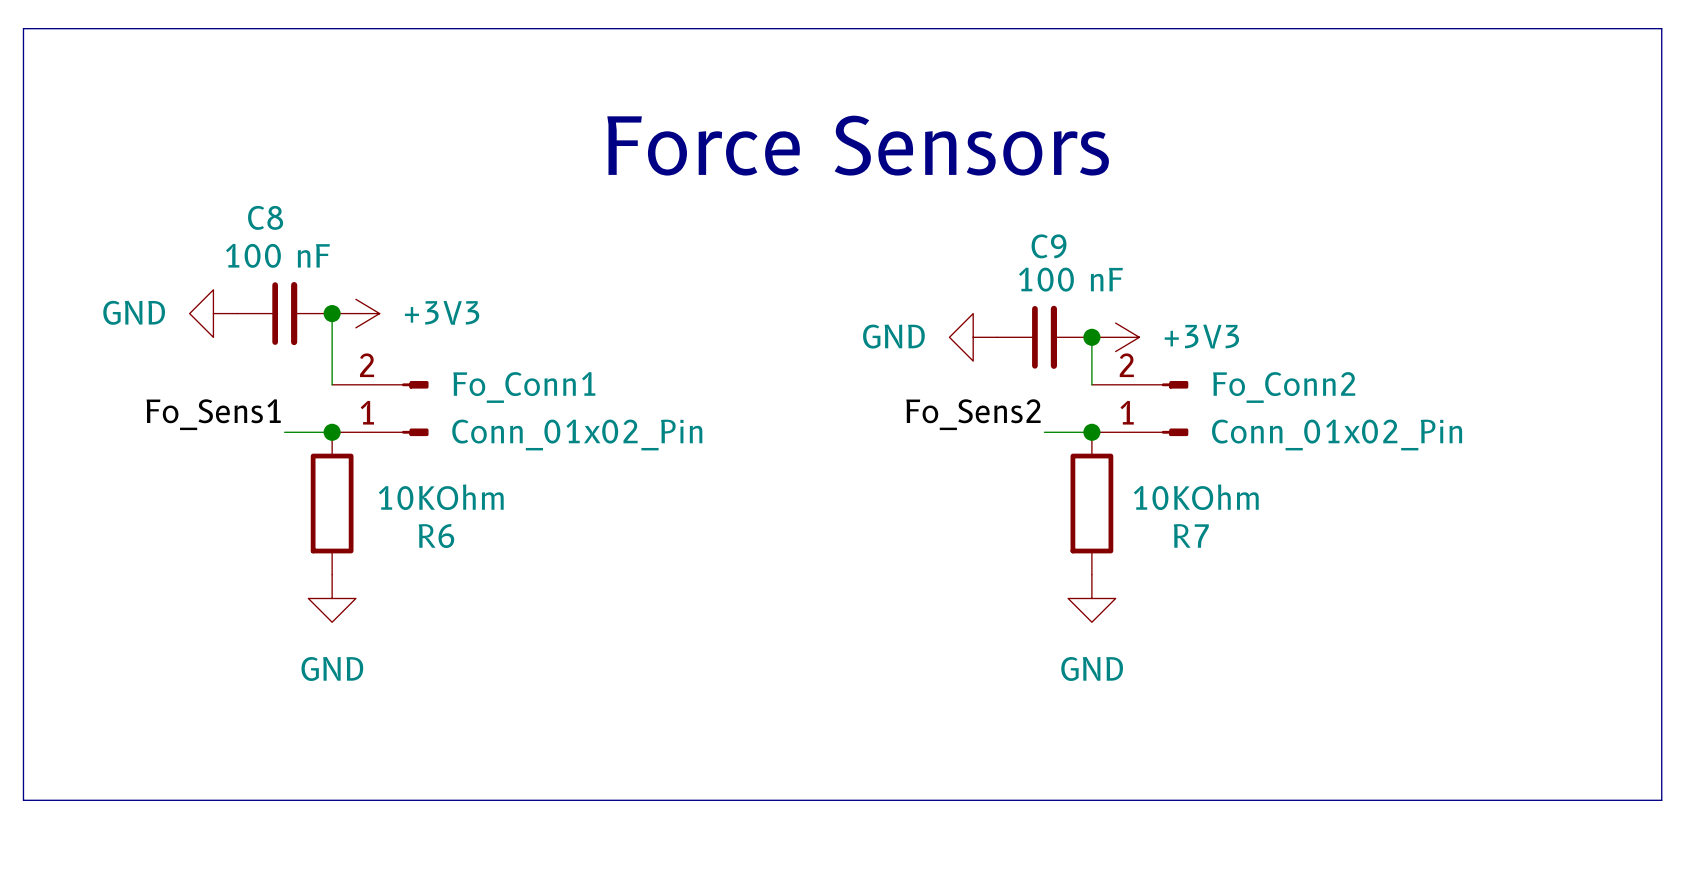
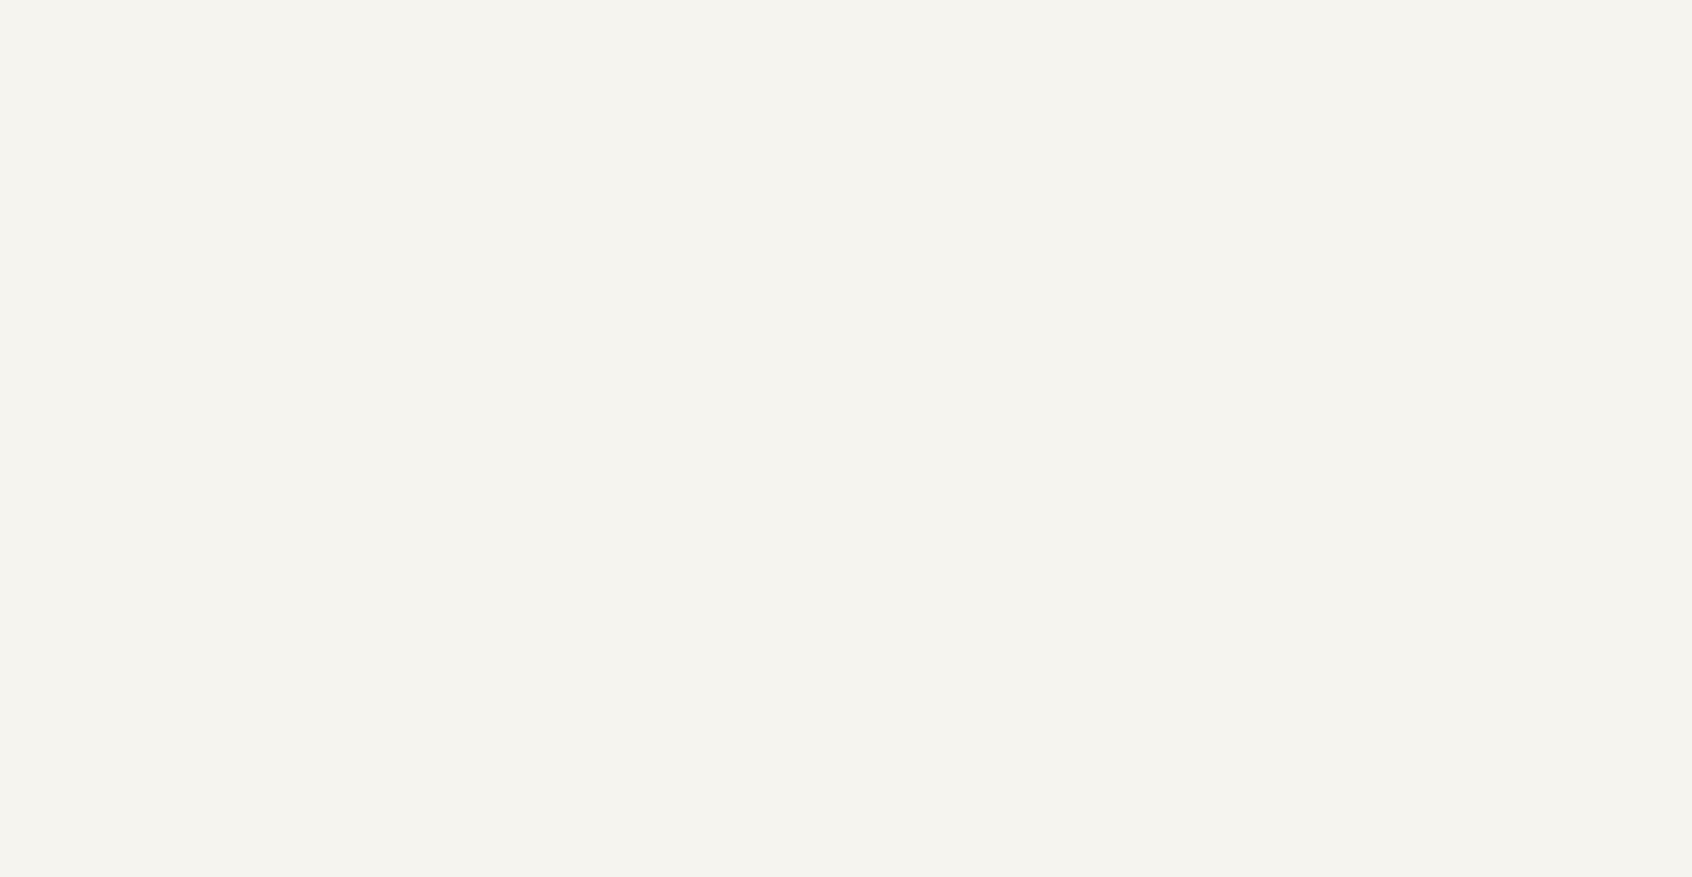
line: (23, 28) (1661, 28) (1661, 800) (23, 800) (23, 28) -> none
text: Force Sensors (858, 145) -> none
power symbol: GND (213, 313) -> none
C8: 100 nF (284, 313) -> none
wire: (332, 313) (332, 384) -> none
junction: (332, 313) -> none
power symbol: +3V3 (355, 313) -> none
power symbol: GND (973, 337) -> none
C9: 100 nF (1044, 337) -> none
wire: (1091, 337) (1091, 384) -> none
junction: (1091, 337) -> none
power symbol: +3V3 (1115, 337) -> none
Fo_Conn1: Conn_01x02_Pin (380, 408) -> none
Fo_Conn2: Conn_01x02_Pin (1140, 408) -> none
label: Fo_Sens1 (213, 414) -> none
label: Fo_Sens2 (973, 414) -> none
wire: (284, 432) (332, 432) -> none
junction: (332, 432) -> none
wire: (1044, 432) (1091, 432) -> none
junction: (1091, 432) -> none
R6: 10KOhm (332, 503) -> none
R7: 10KOhm (1091, 503) -> none
power symbol: GND (332, 598) -> none
power symbol: GND (1091, 598) -> none

